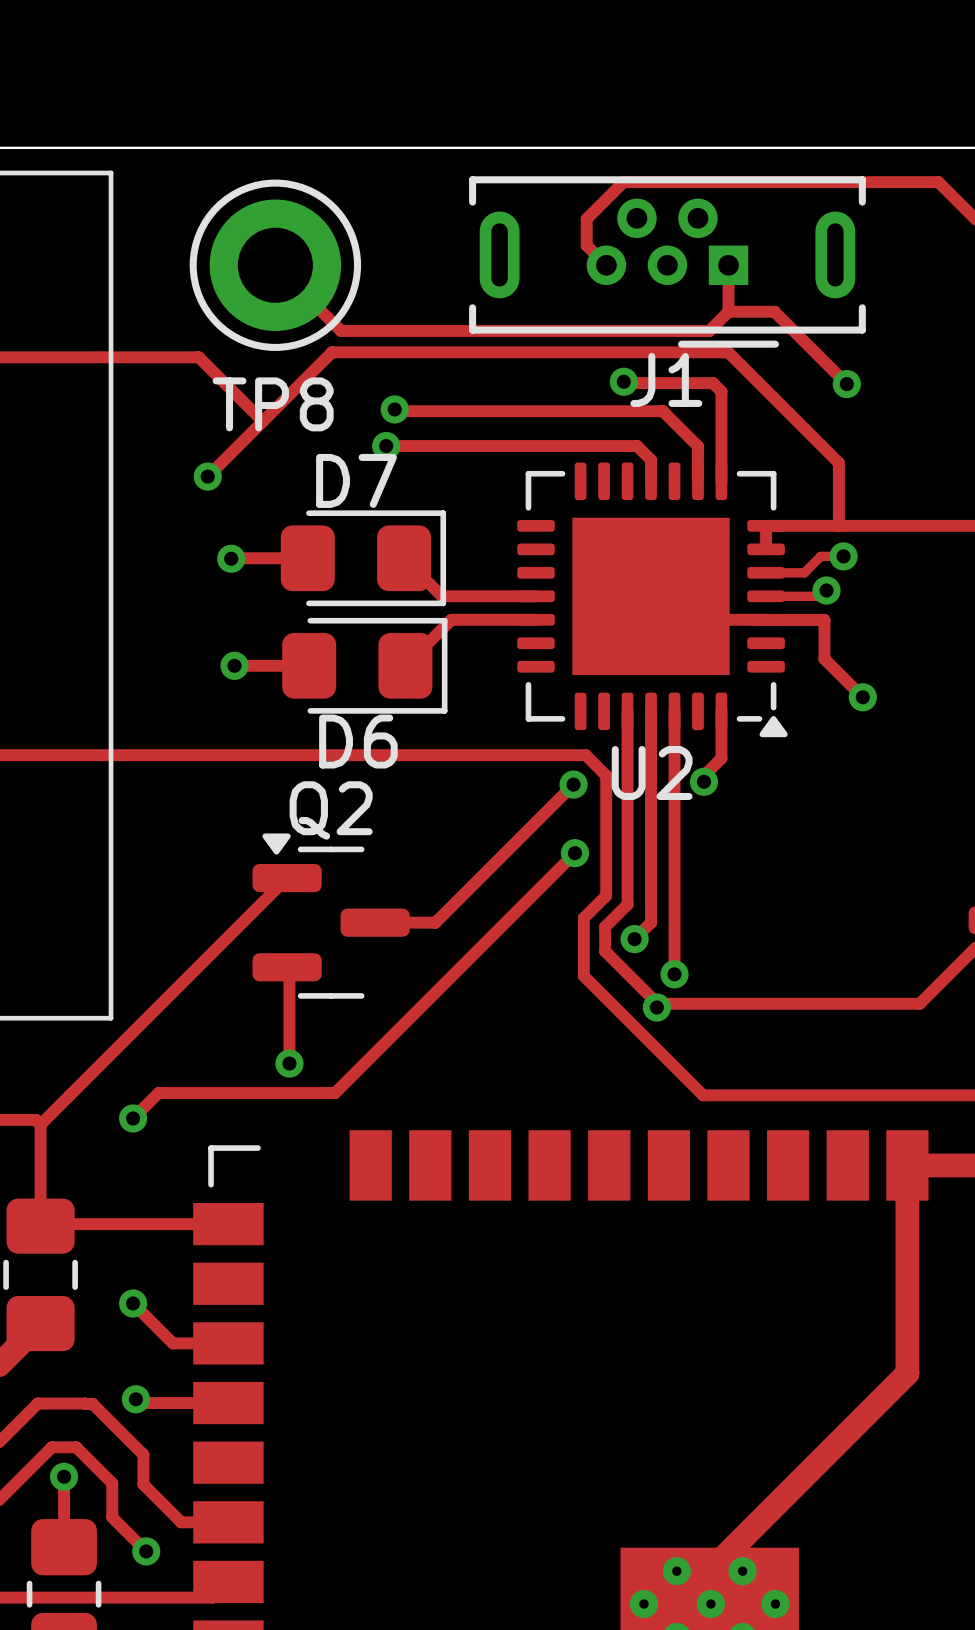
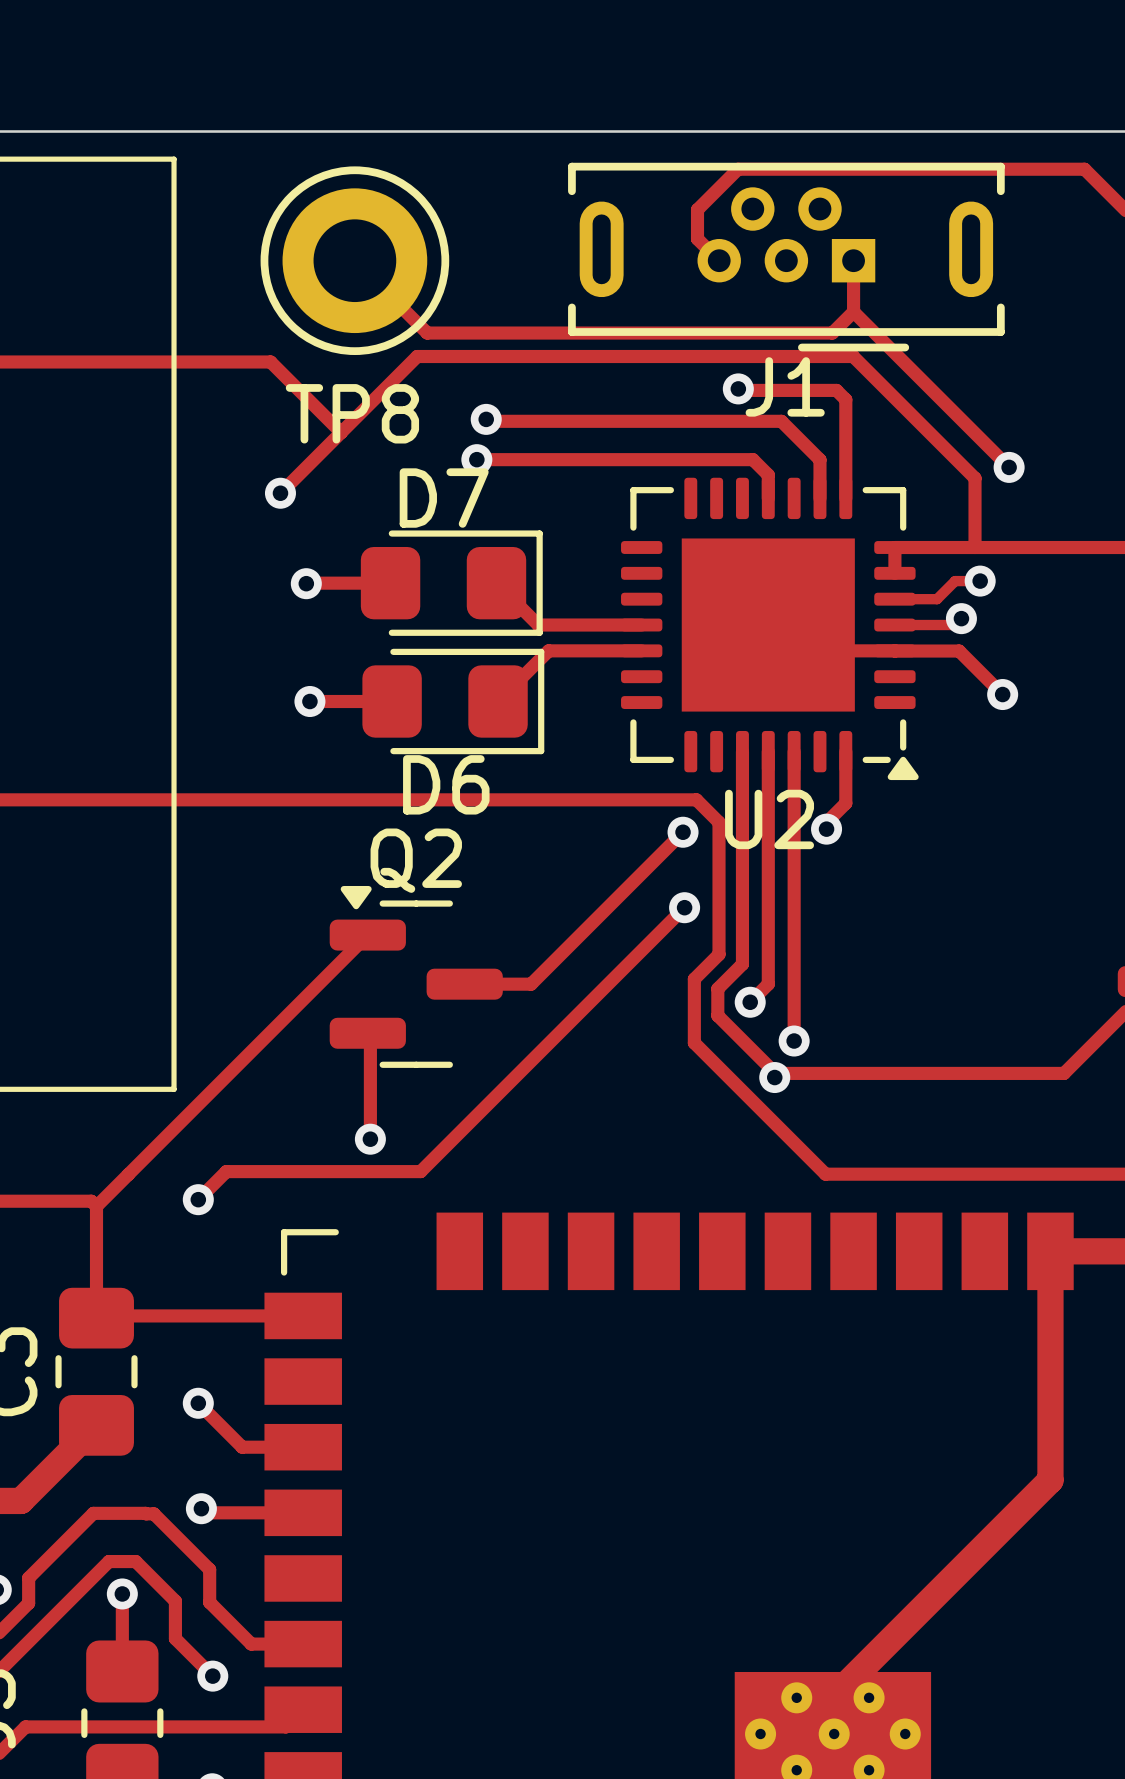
track: (728, 311) (774, 311) (846, 384) -> (853, 311) (1009, 467)
via position: (846, 384) -> (1009, 467)
track: (824, 619) (824, 658) (862, 697) -> (959, 651) (1006, 697)
via position: (862, 697) -> (1002, 694)

